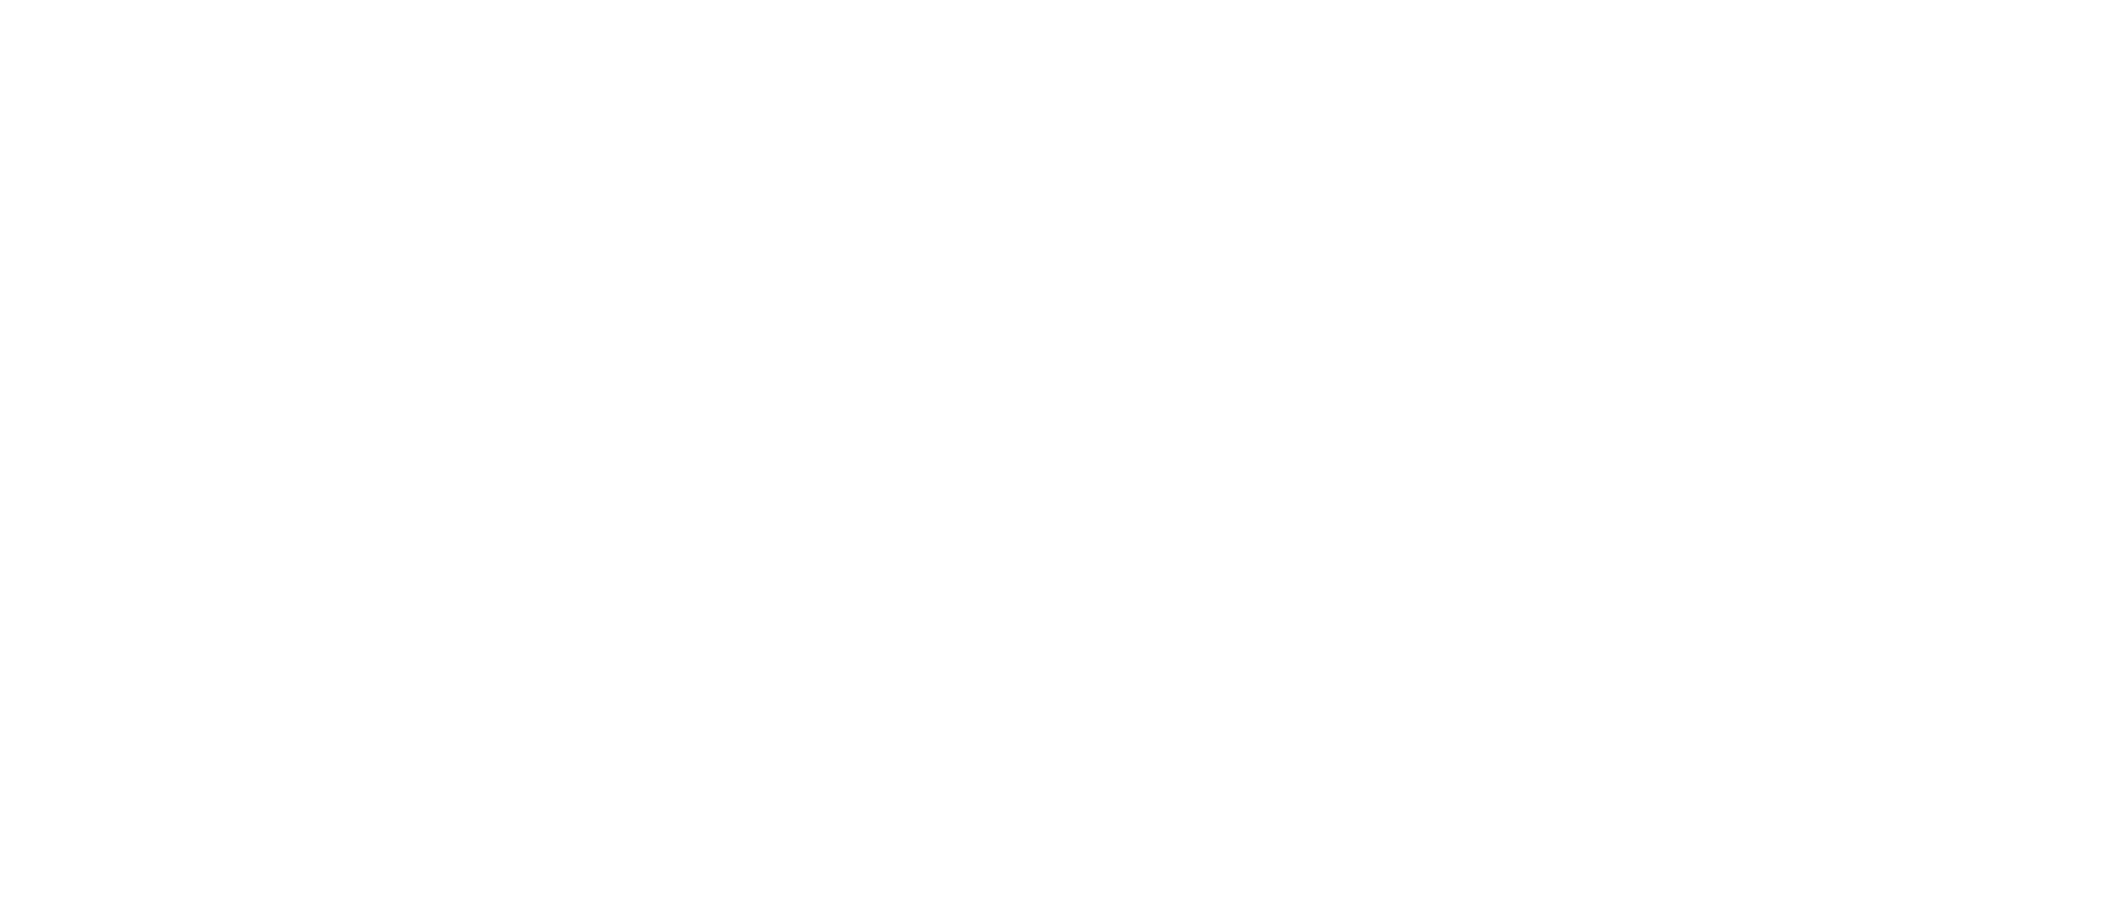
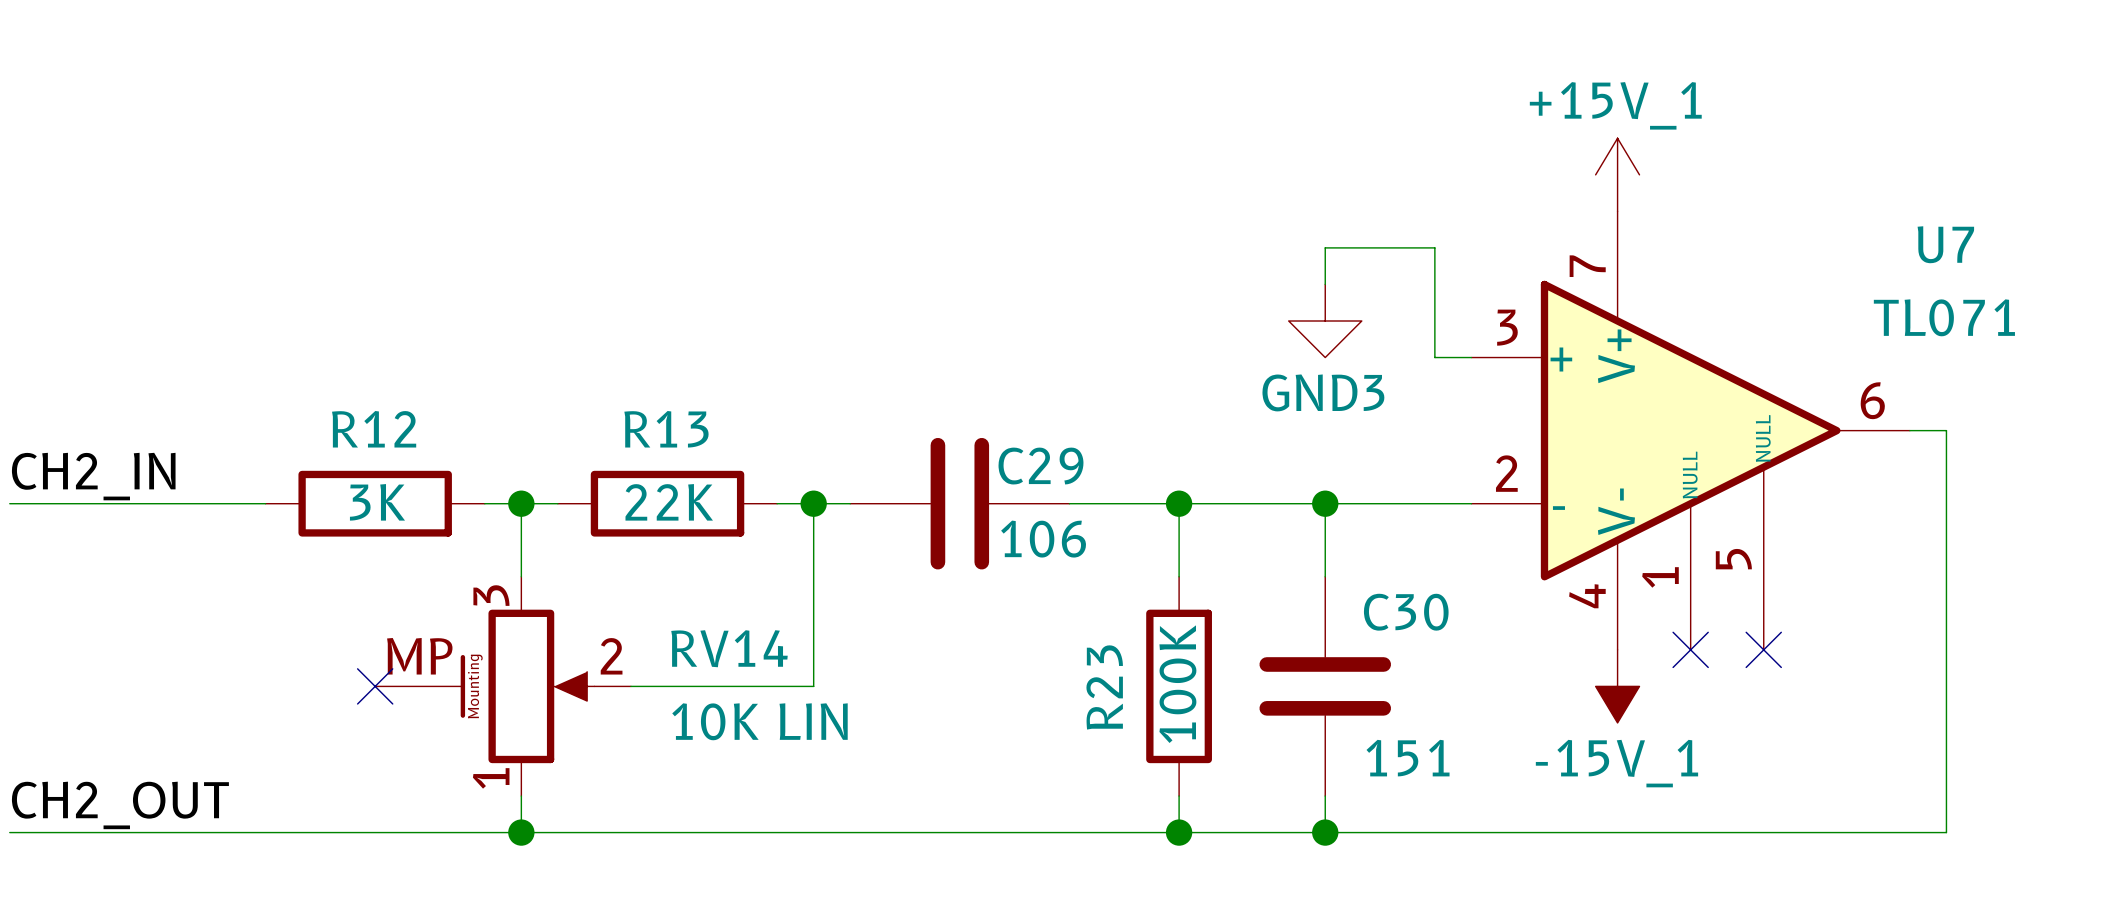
power symbol: none -> +15V_1 (1617, 174)
wire: none -> (1325, 284) (1325, 247) (1434, 247) (1434, 357) (1471, 357)
power symbol: none -> GND3 (1325, 321)
U7: none -> TL071 (1690, 430)
wire: none -> (1909, 430) (1946, 430) (1946, 832) (9, 832)
label: none -> CH2_IN (93, 476)
wire: none -> (9, 503) (265, 503)
R12: none -> 3K (375, 503)
wire: none -> (484, 503) (557, 503)
wire: none -> (521, 503) (521, 576)
junction: none -> (521, 503)
R13: none -> 22K (667, 503)
wire: none -> (777, 503) (850, 503)
wire: none -> (813, 503) (813, 686) (630, 686)
junction: none -> (813, 503)
C29: none -> 106 (959, 503)
wire: none -> (1069, 503) (1471, 503)
wire: none -> (1179, 503) (1179, 576)
junction: none -> (1179, 503)
wire: none -> (1325, 503) (1325, 576)
junction: none -> (1325, 503)
no-connect mark: none -> (1690, 649)
no-connect mark: none -> (1763, 649)
no-connect mark: none -> (375, 686)
RV14: none -> 10K LIN (503, 686)
R23: none -> 100K (1179, 686)
C30: none -> 151 (1325, 686)
power symbol: none -> -15V_1 (1617, 686)
wire: none -> (521, 796) (521, 832)
wire: none -> (1179, 796) (1179, 832)
wire: none -> (1325, 796) (1325, 832)
label: none -> CH2_OUT (120, 805)
junction: none -> (521, 832)
junction: none -> (1179, 832)
junction: none -> (1325, 832)

